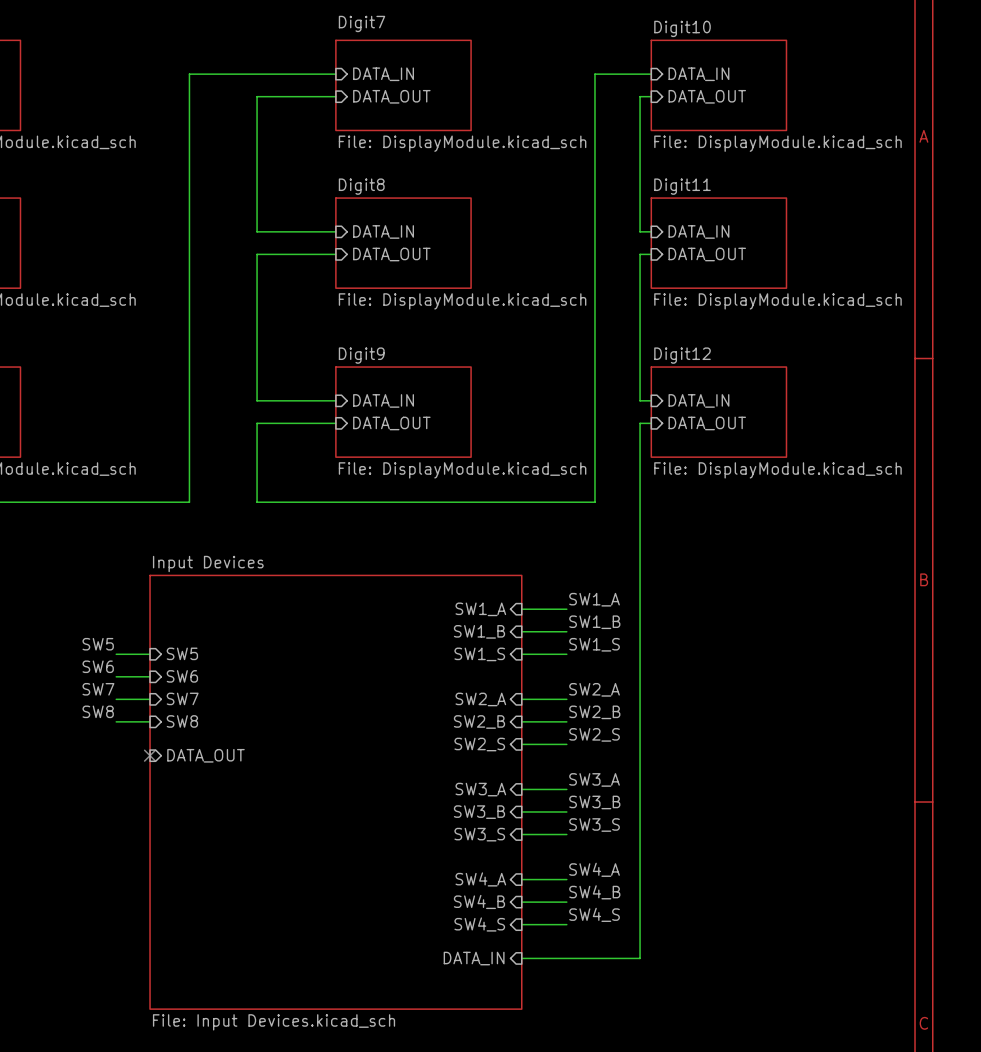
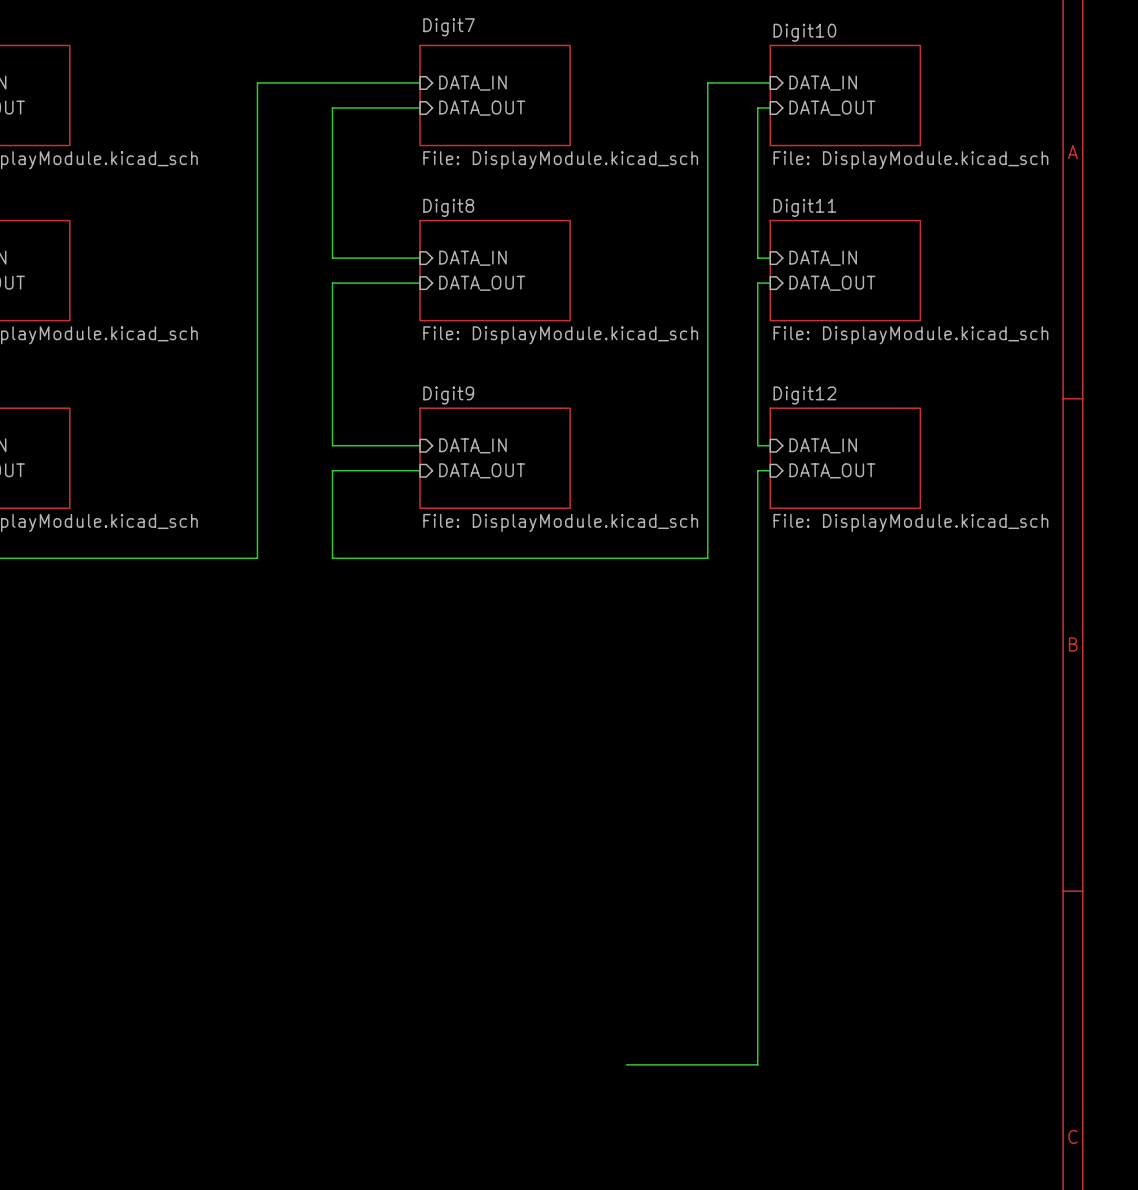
label: SW1_A (594, 599) -> none
sheet pin: SW1_A (480, 609) -> none
wire: (521, 609) (566, 609) -> none
label: SW1_B (594, 622) -> none
sheet pin: SW1_B (479, 631) -> none
wire: (521, 631) (566, 631) -> none
label: SW5 (98, 644) -> none
label: SW1_S (594, 644) -> none
sheet pin: SW5 (182, 653) -> none
wire: (116, 654) (150, 654) -> none
sheet pin: SW1_S (479, 654) -> none
wire: (521, 654) (566, 654) -> none
label: SW6 (98, 666) -> none
wire: (116, 676) (150, 676) -> none
sheet pin: SW6 (182, 676) -> none
label: SW7 (98, 689) -> none
label: SW2_A (594, 689) -> none
sheet pin: SW7 (182, 698) -> none
wire: (116, 699) (150, 699) -> none
sheet pin: SW2_A (480, 699) -> none
wire: (521, 699) (566, 699) -> none
label: SW8 (98, 711) -> none
label: SW2_B (594, 712) -> none
wire: (116, 721) (150, 721) -> none
sheet pin: SW8 (182, 721) -> none
sheet pin: SW2_B (479, 721) -> none
wire: (521, 721) (566, 721) -> none
label: SW2_S (594, 734) -> none
sheet pin: SW2_S (479, 744) -> none
wire: (521, 744) (566, 744) -> none
no-connect mark: (150, 755) -> none
sheet pin: DATA_OUT (205, 755) -> none
label: SW3_A (594, 779) -> none
sheet pin: SW3_A (480, 789) -> none
wire: (521, 789) (566, 789) -> none
sheet Input Devices: File: Input Devices.kicad_sch (335, 792) -> none
label: SW3_B (594, 802) -> none
wire: (521, 811) (566, 811) -> none
sheet pin: SW3_B (479, 812) -> none
label: SW3_S (594, 825) -> none
sheet pin: SW3_S (479, 834) -> none
wire: (521, 834) (566, 834) -> none
label: SW4_A (594, 869) -> none
sheet pin: SW4_A (480, 879) -> none
wire: (521, 879) (566, 879) -> none
label: SW4_B (594, 892) -> none
sheet pin: SW4_B (479, 901) -> none
wire: (521, 902) (566, 902) -> none
label: SW4_S (594, 914) -> none
sheet pin: SW4_S (479, 924) -> none
wire: (521, 924) (566, 924) -> none
sheet pin: DATA_IN (474, 958) -> none

